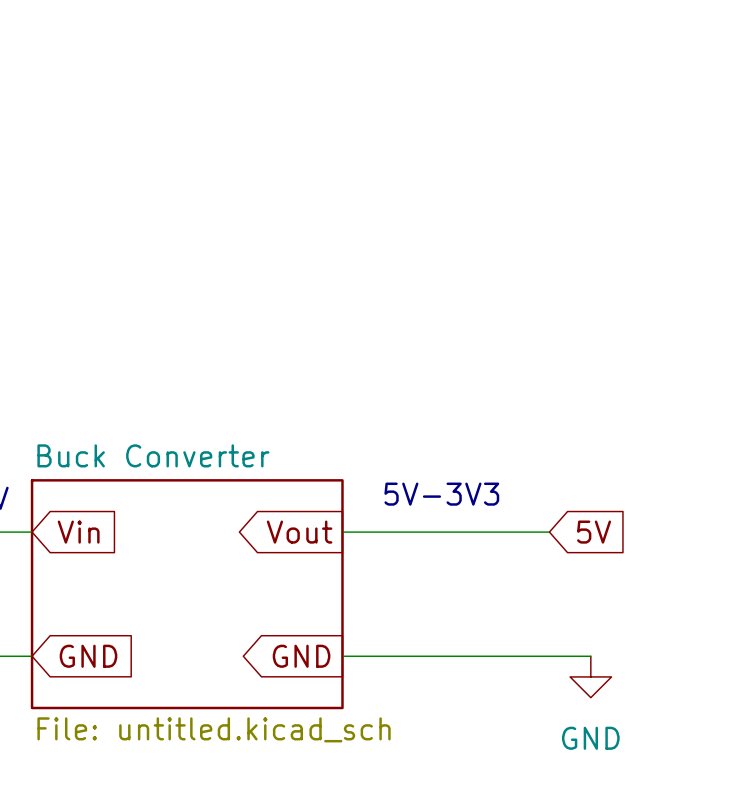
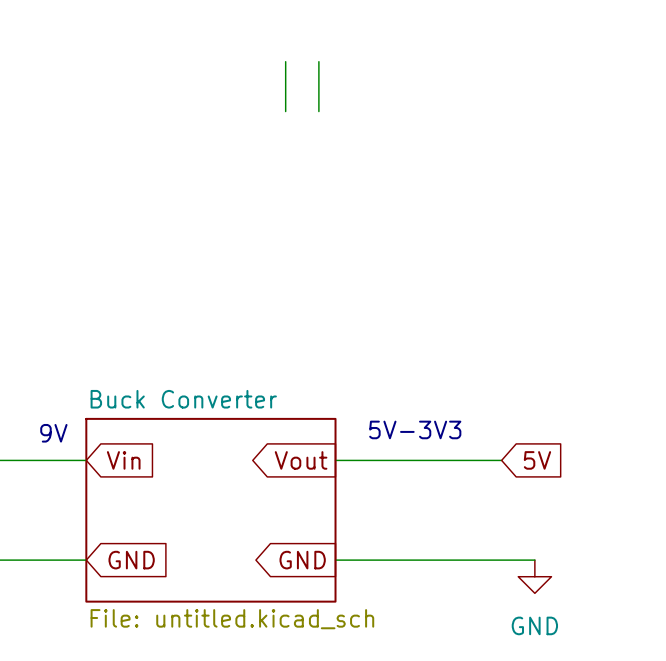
wire: none -> (285, 61) (285, 111)
wire: none -> (318, 61) (318, 111)

